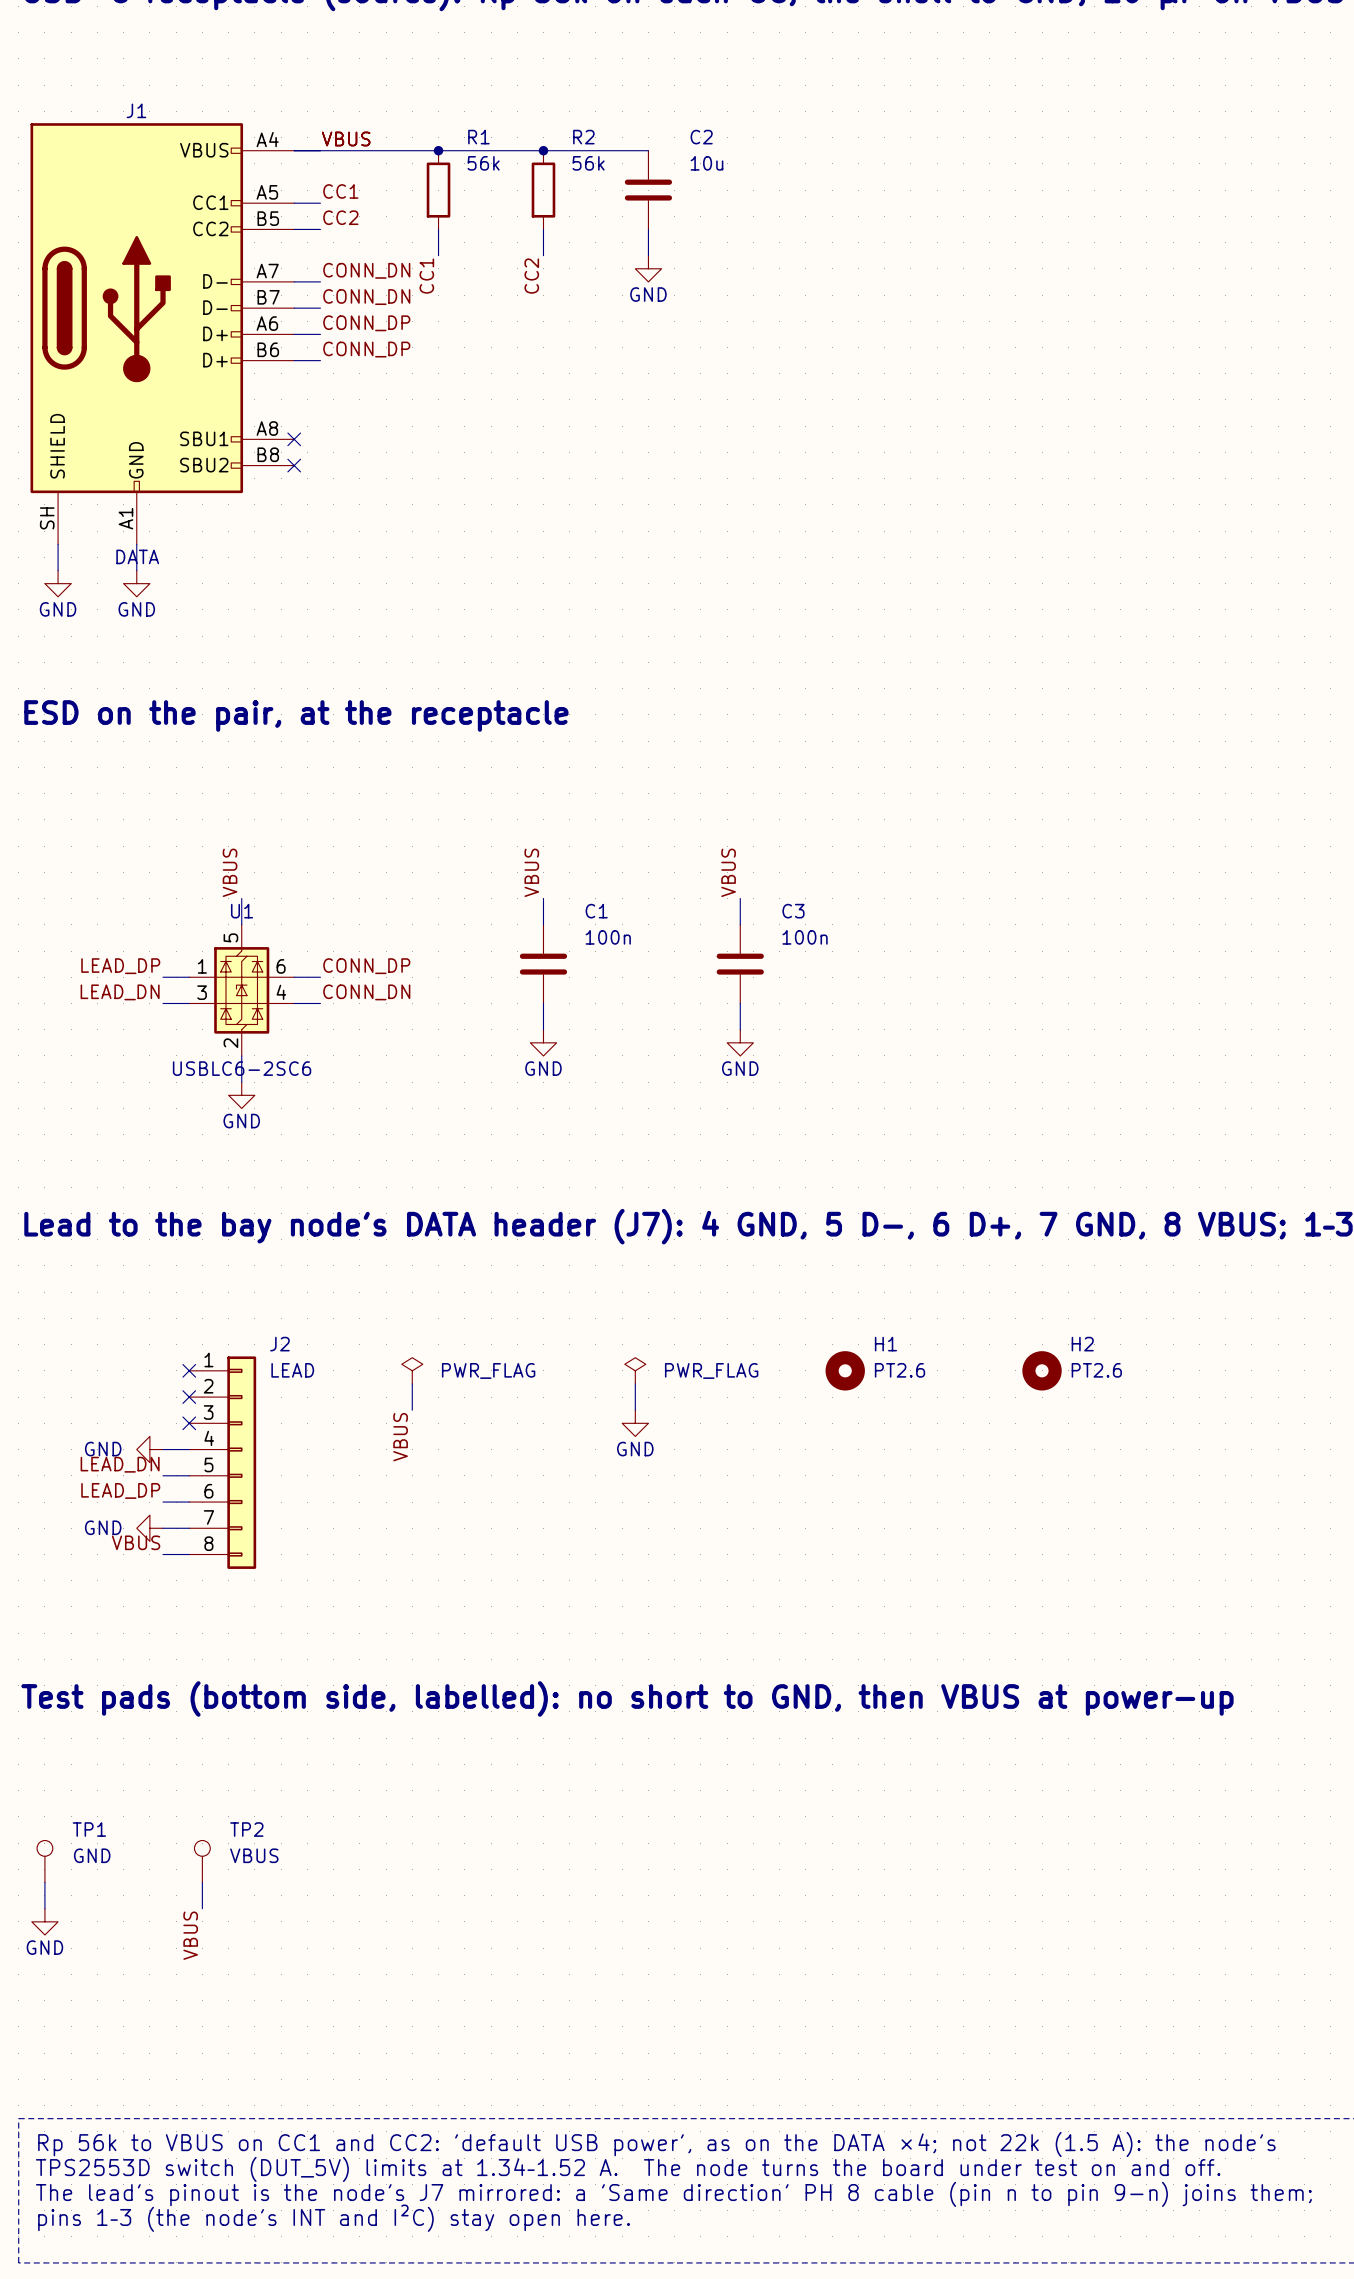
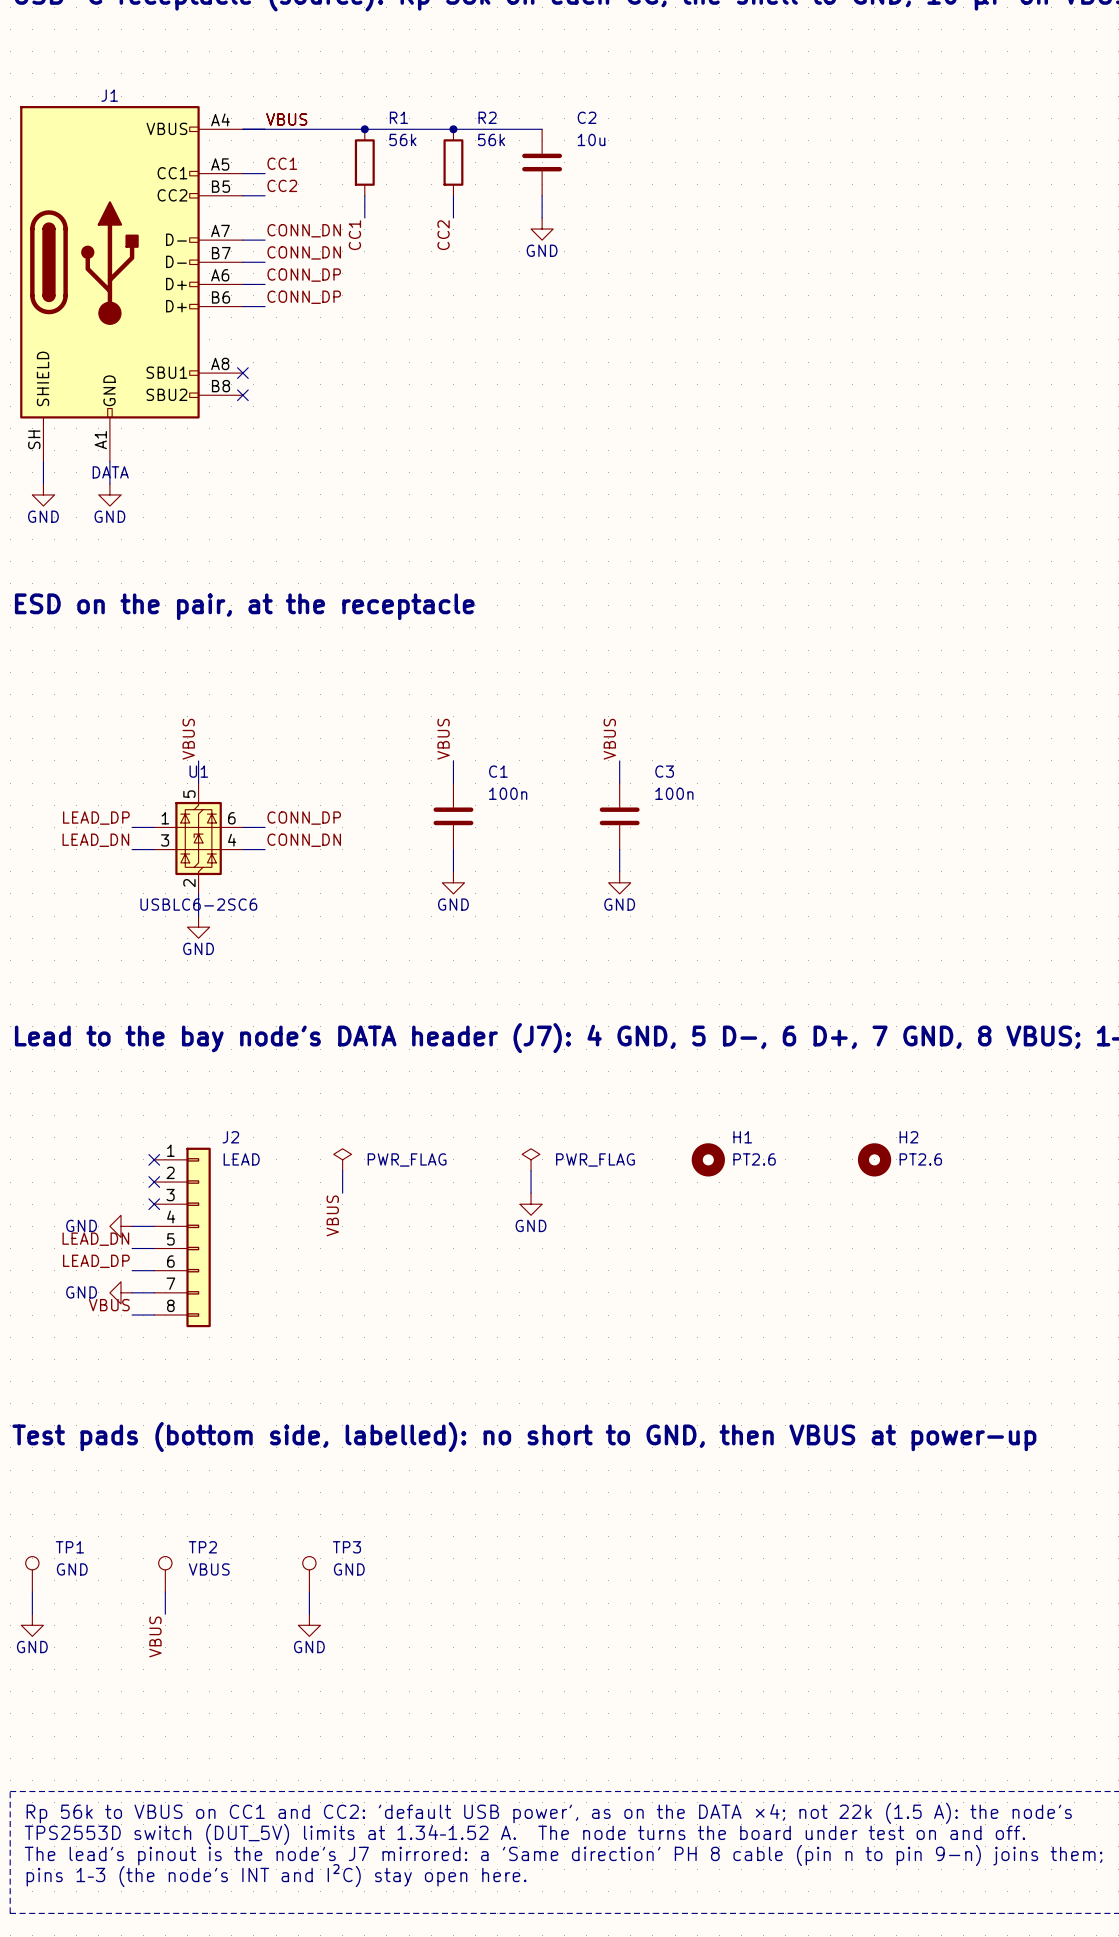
TP3: none -> GND (309, 1574)
wire: none -> (309, 1592) (309, 1614)
power symbol: none -> GND (309, 1625)

